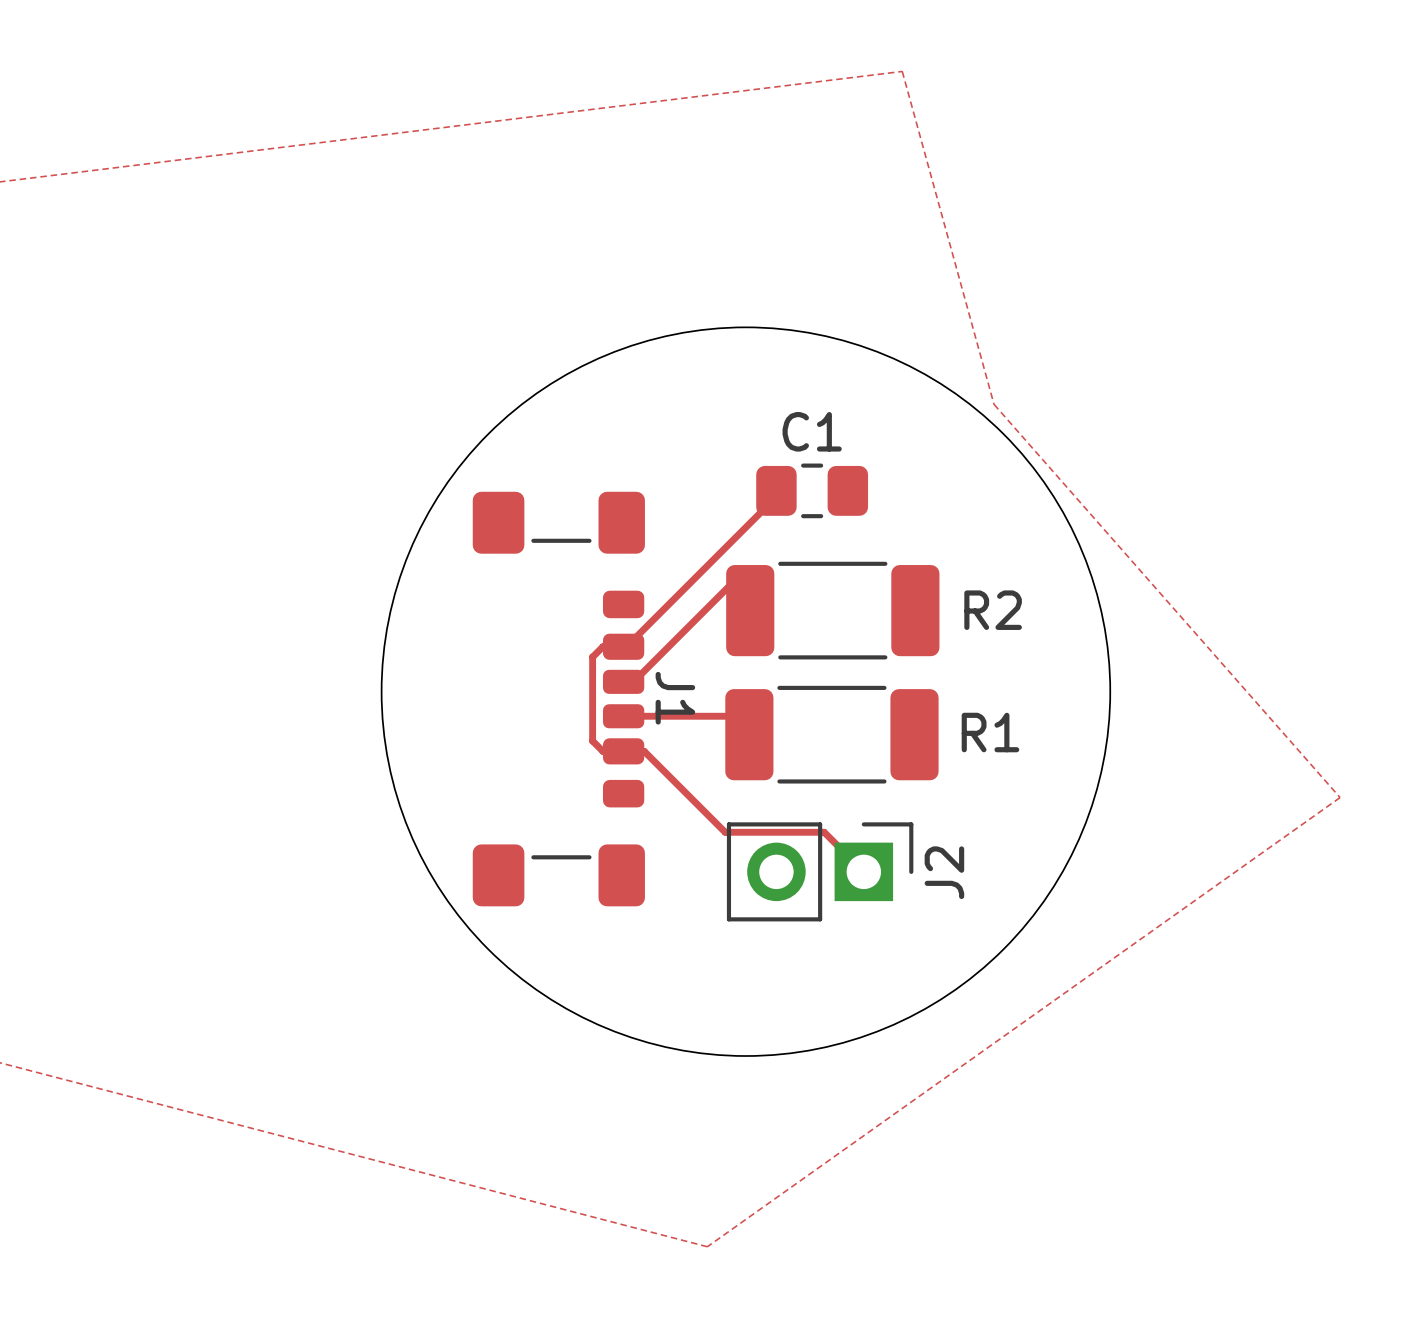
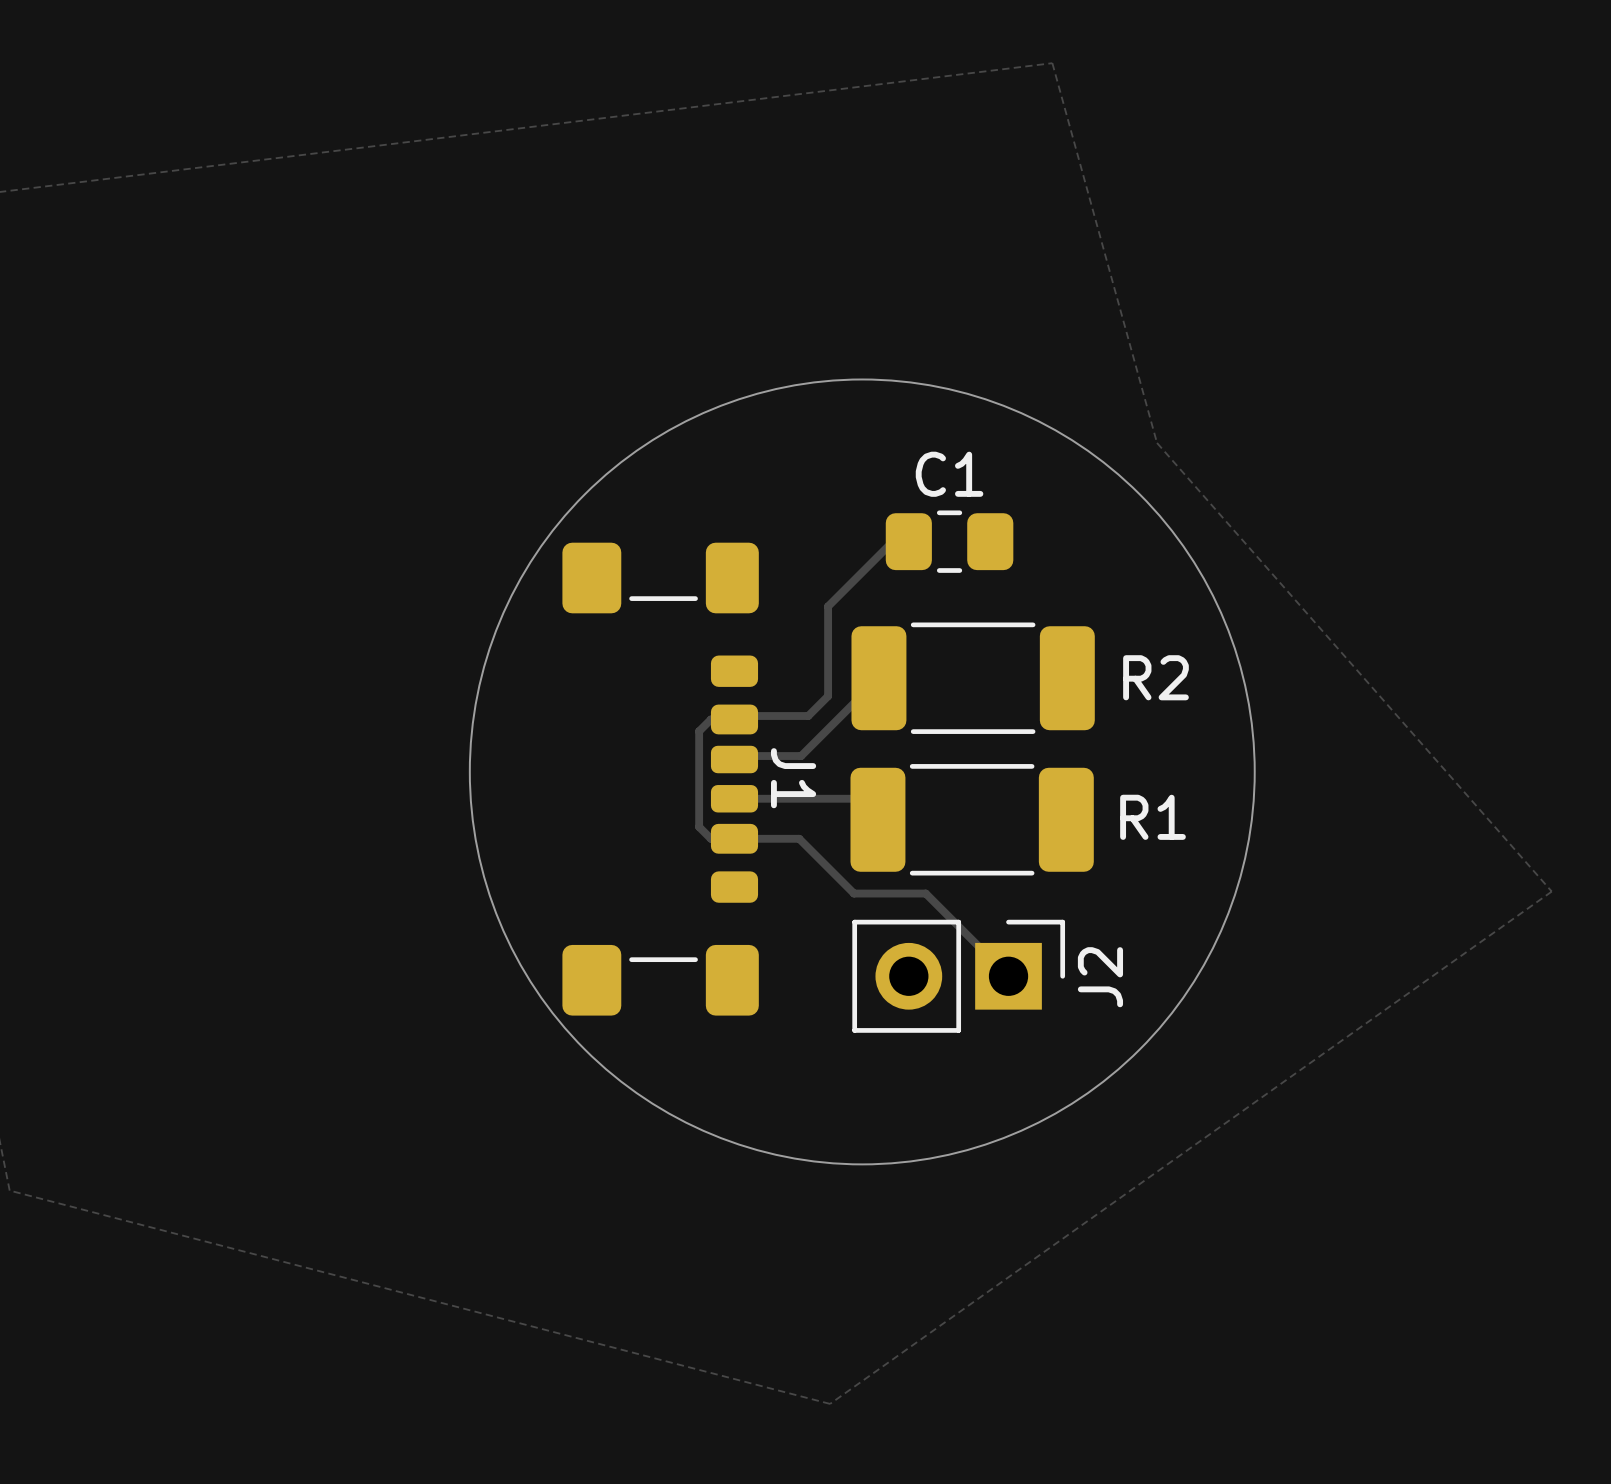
round board edge size: [380, 326, 1112, 1057] -> [468, 378, 1256, 1166]
track: none -> (908, 541) (892, 541) (828, 606) (828, 696) (808, 716) (732, 716)
track: (776, 496) (626, 646) -> none
track: (742, 573) (633, 681) -> none
track: none -> (878, 678) (801, 756) (732, 756)
track: (644, 751) (725, 832) (824, 832) -> (758, 838) (799, 838) (854, 893) (925, 893) (963, 931)

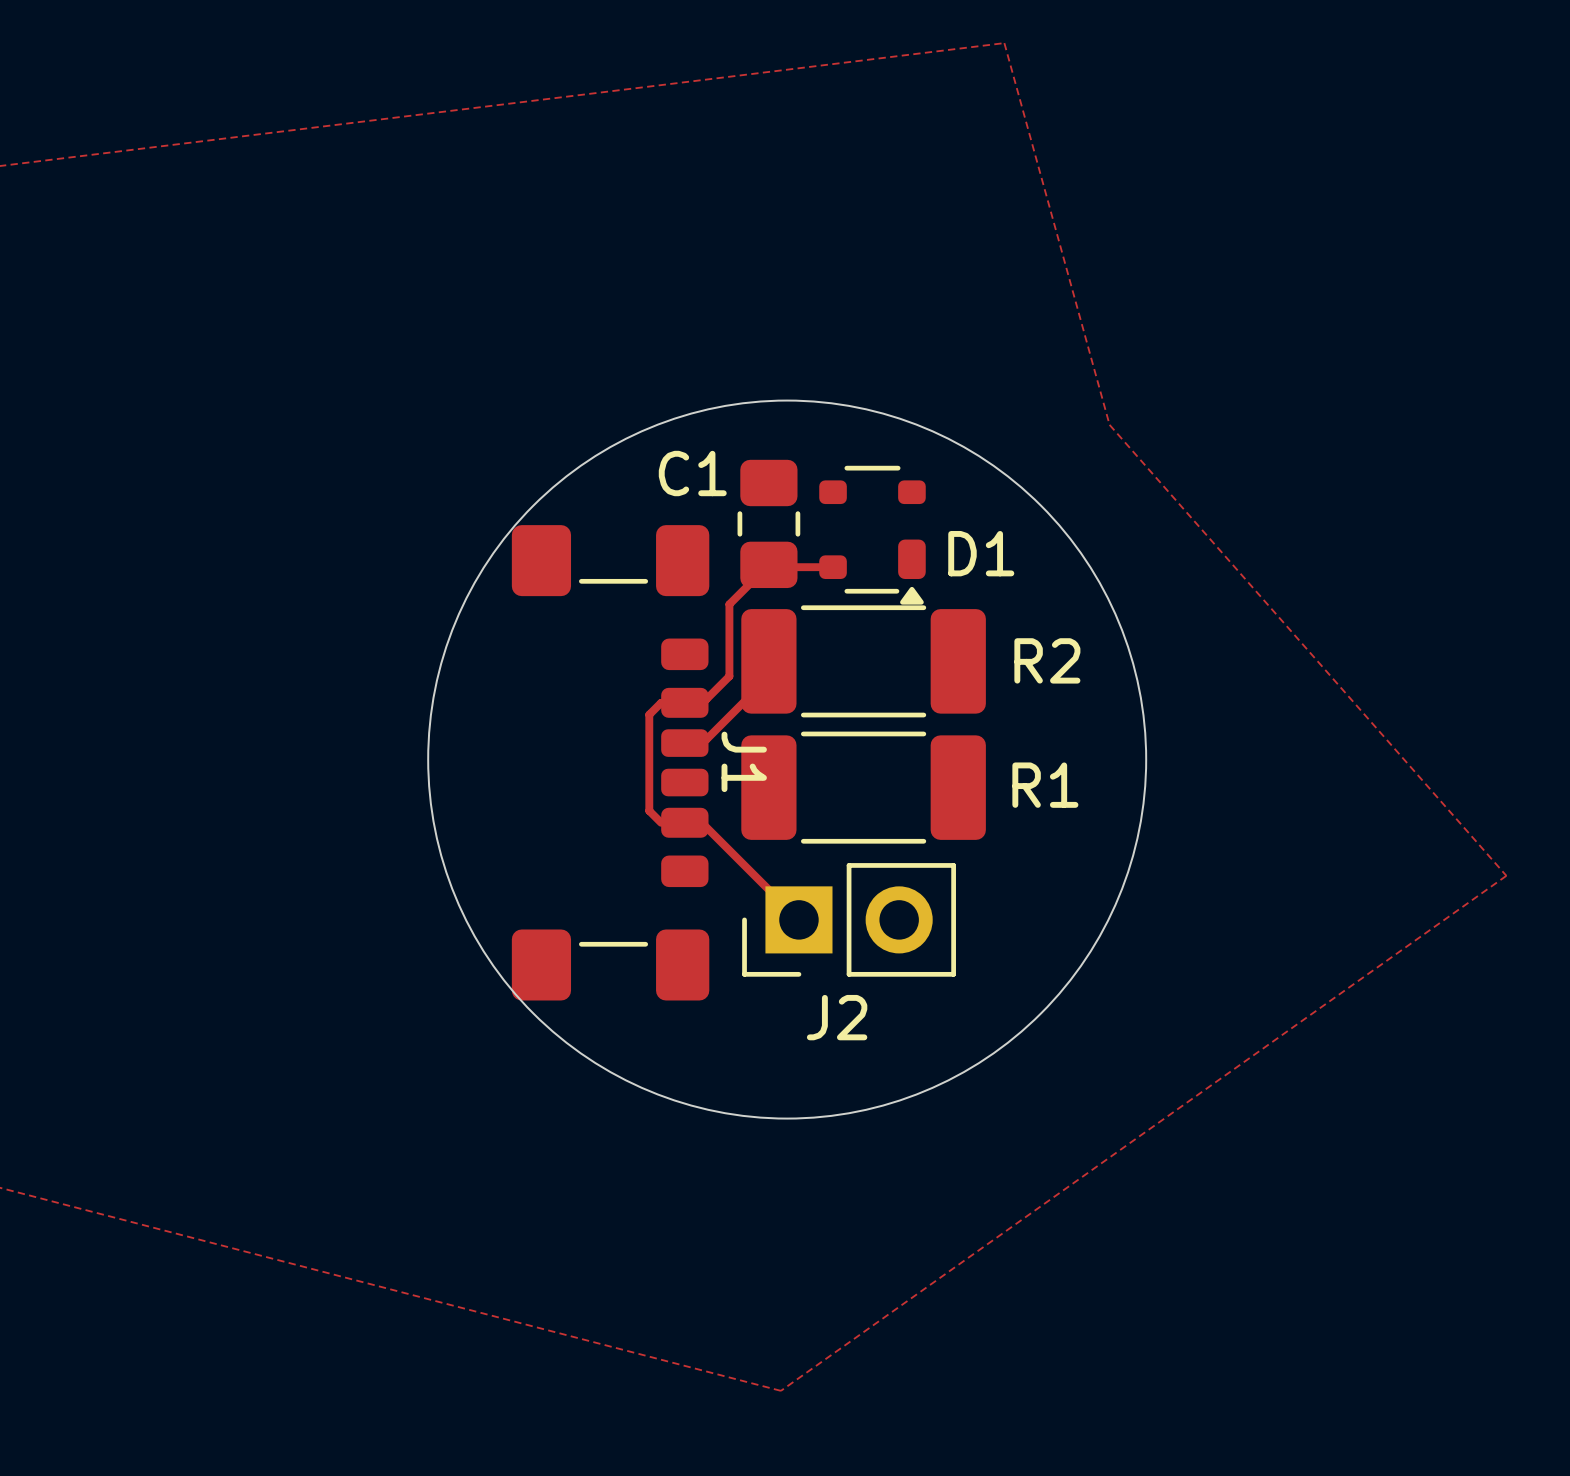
round board edge size: [468, 378, 1256, 1166] -> [427, 399, 1148, 1120]
C1 rotation: 0° (949, 541) -> 90° clockwise (768, 523)
C1 position: (949, 541) -> (768, 523)
track: (908, 548) (908, 541) (892, 541) (828, 606) (828, 696) (808, 716) (755, 716) -> (833, 567) (771, 567) (768, 564) (729, 604) (729, 676) (706, 699)
D1: none -> (872, 535)
track: (878, 678) (801, 756) (755, 756) -> (768, 661) (768, 677) (706, 739)
R2 position: (973, 678) -> (863, 661)
track: (734, 798) (856, 798) (877, 819) -> none
R1 position: (972, 819) -> (863, 787)
track: none -> (682, 819) (698, 819) (798, 919)
track: (710, 838) (799, 838) (854, 893) (925, 893) (1008, 976) -> none
J2 rotation: 0° (958, 976) -> 180° (849, 919)
J2 name position: J2 (1100, 977) -> J2 (837, 1017)

